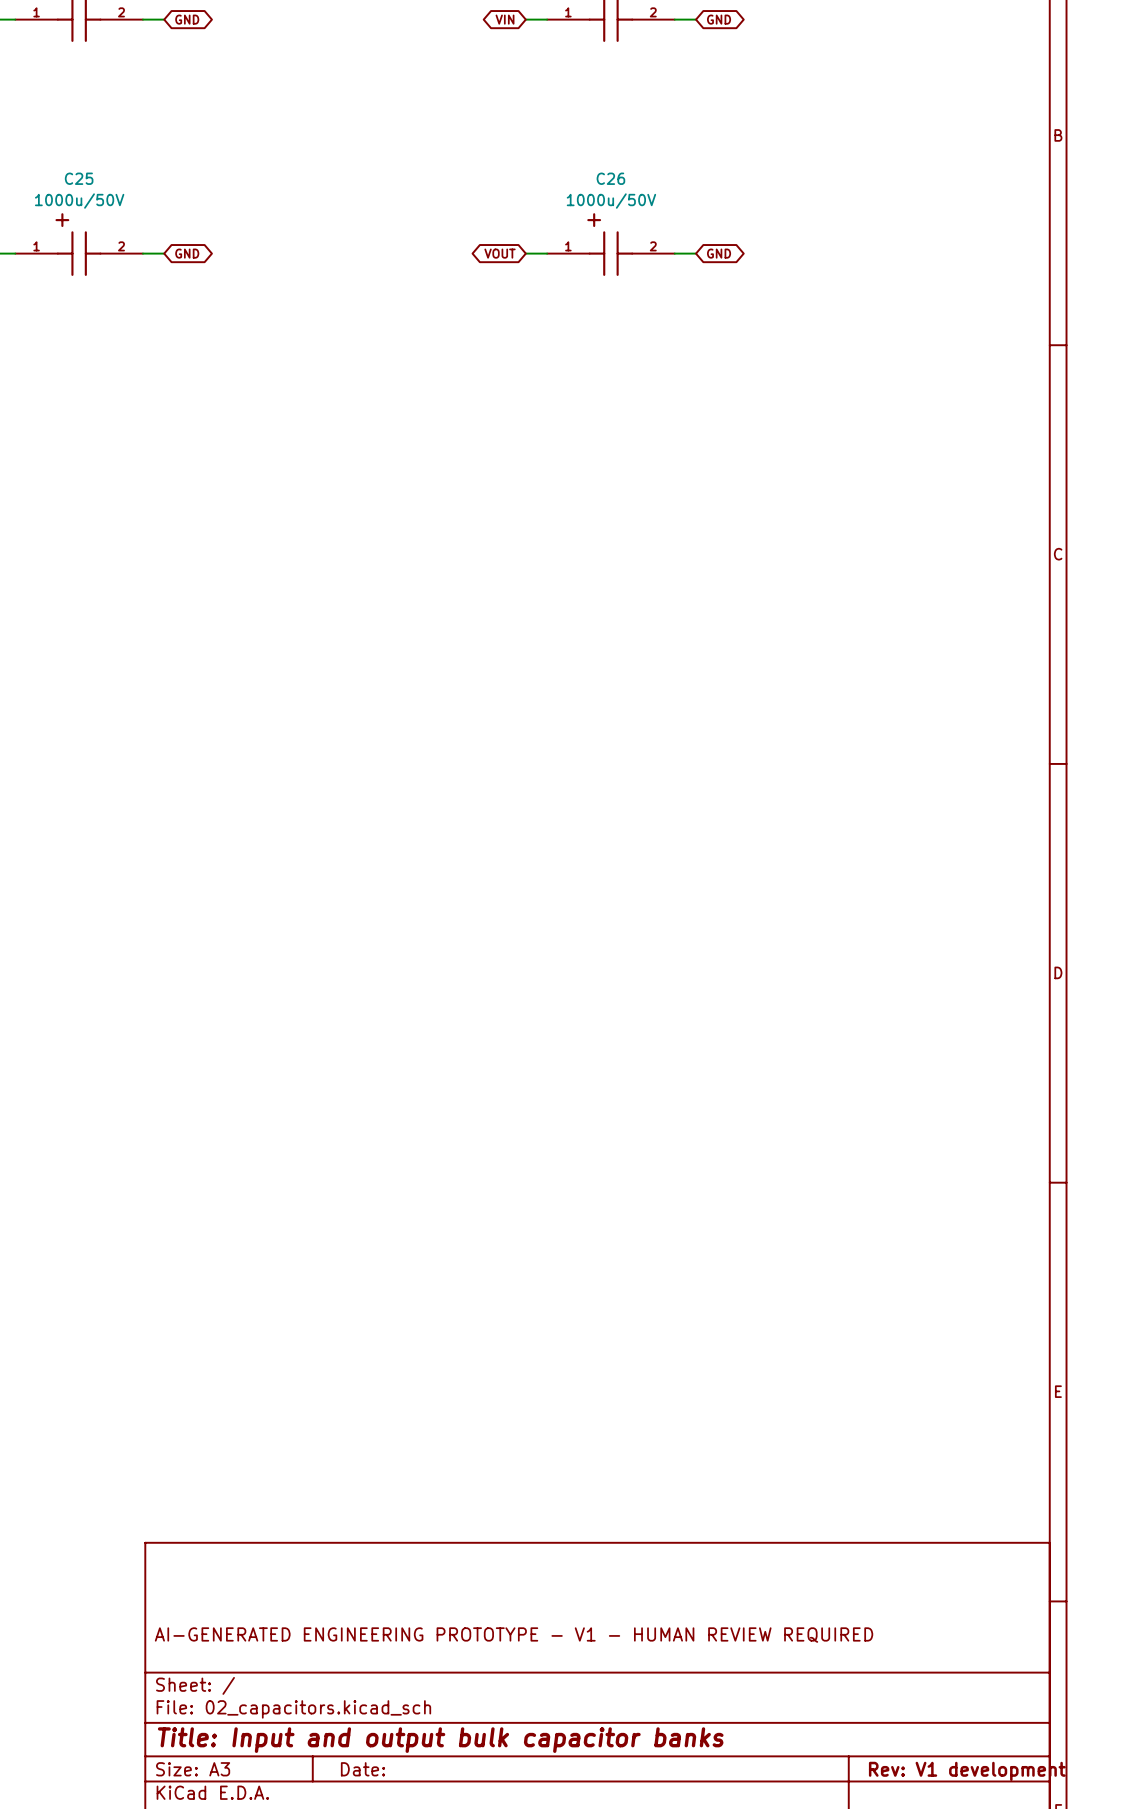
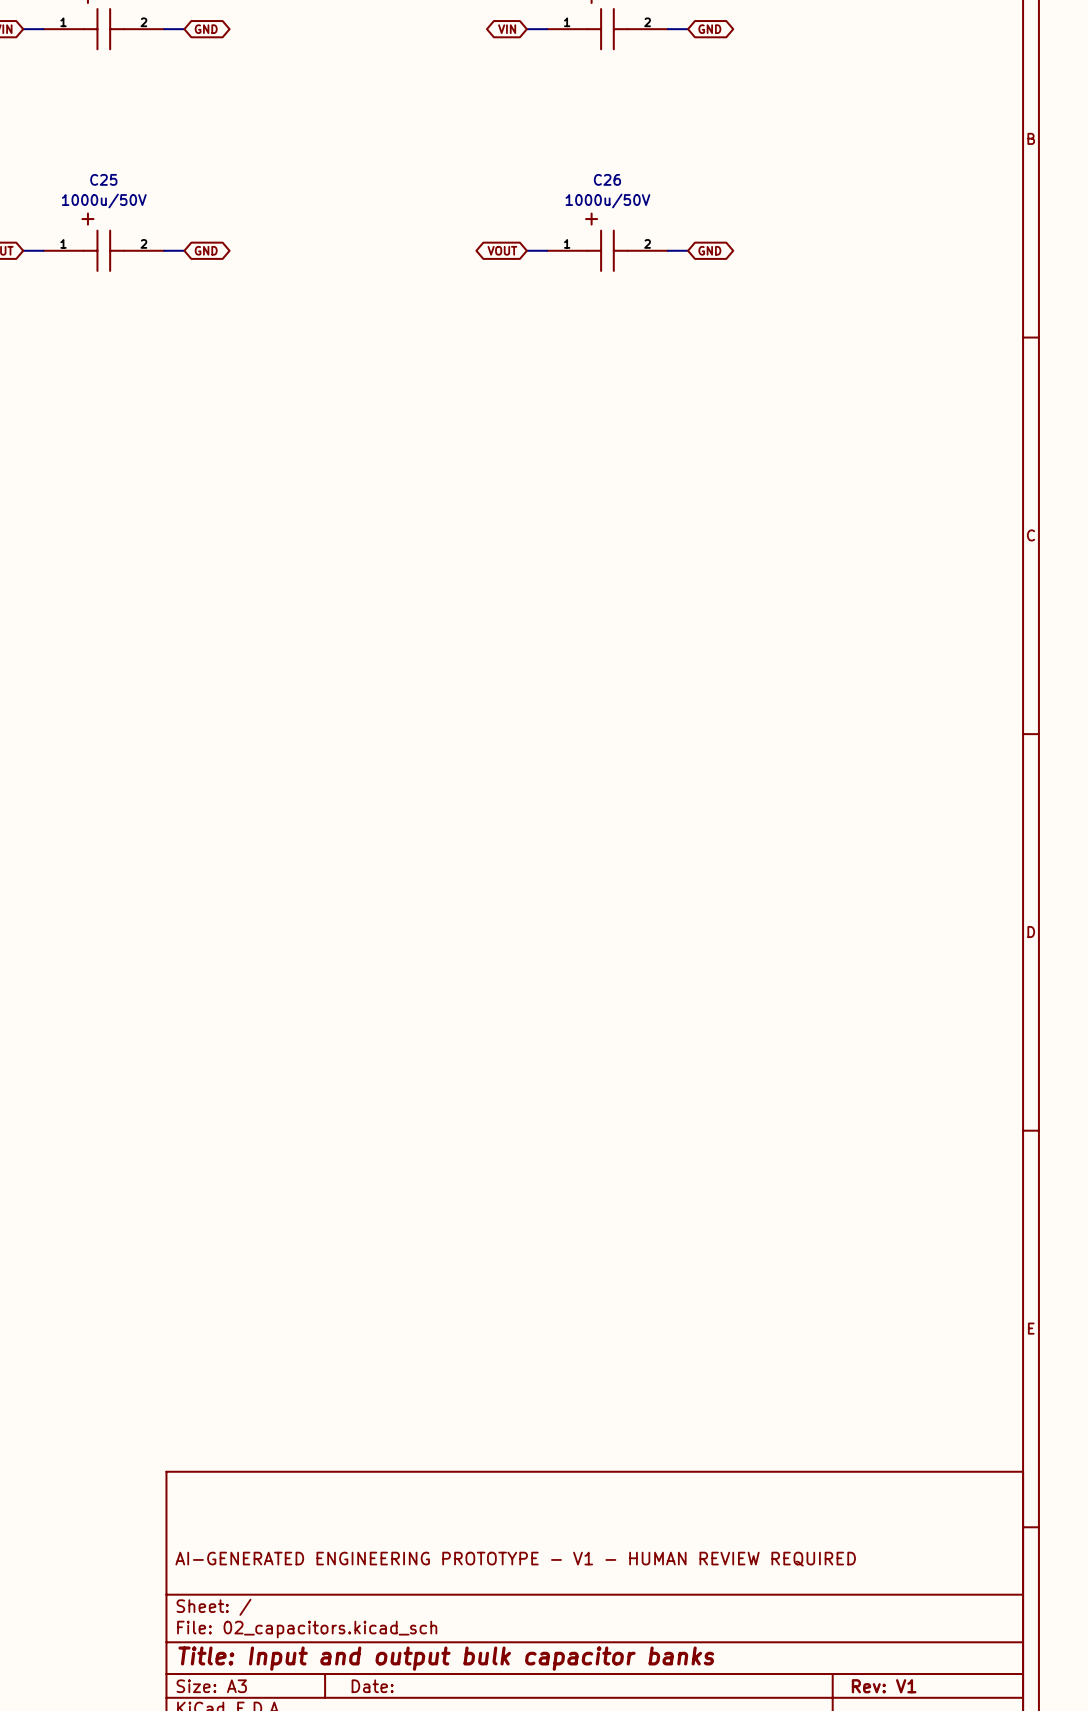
title block: Rev: V1 development (967, 1771) -> Rev: V1 (884, 1686)

